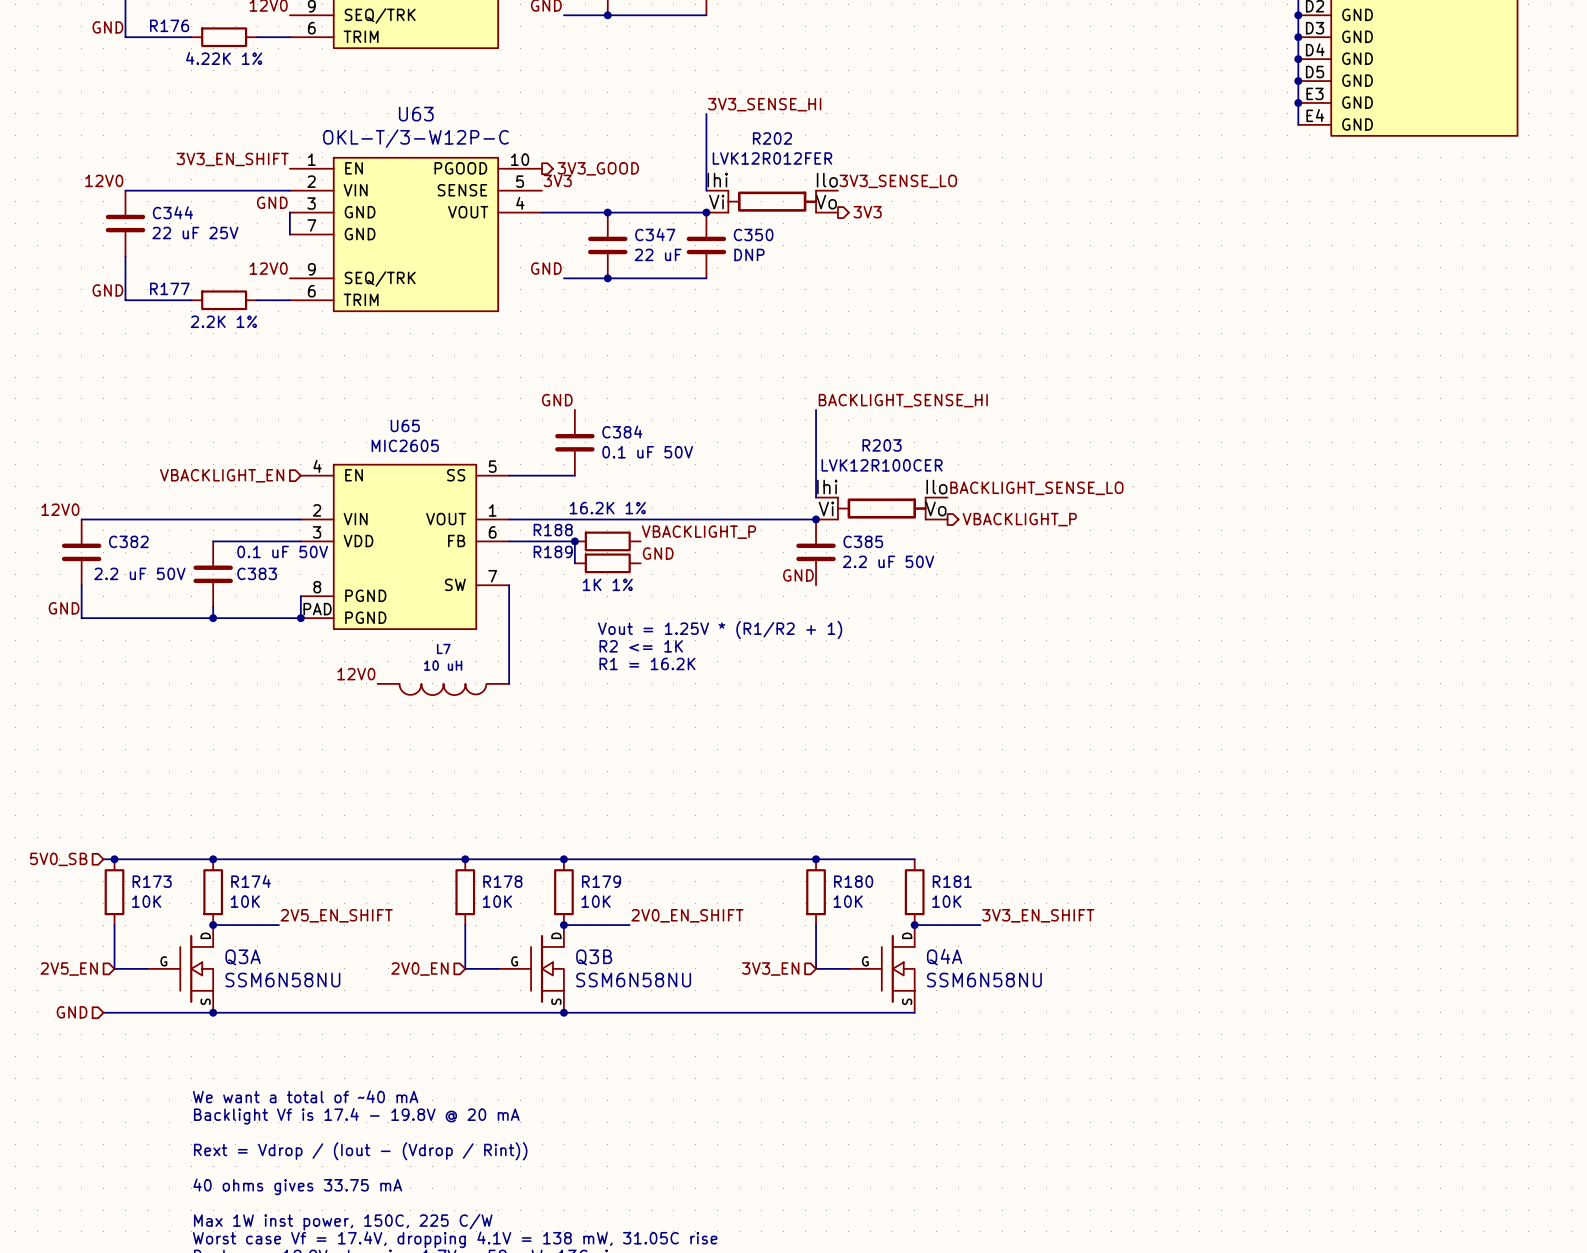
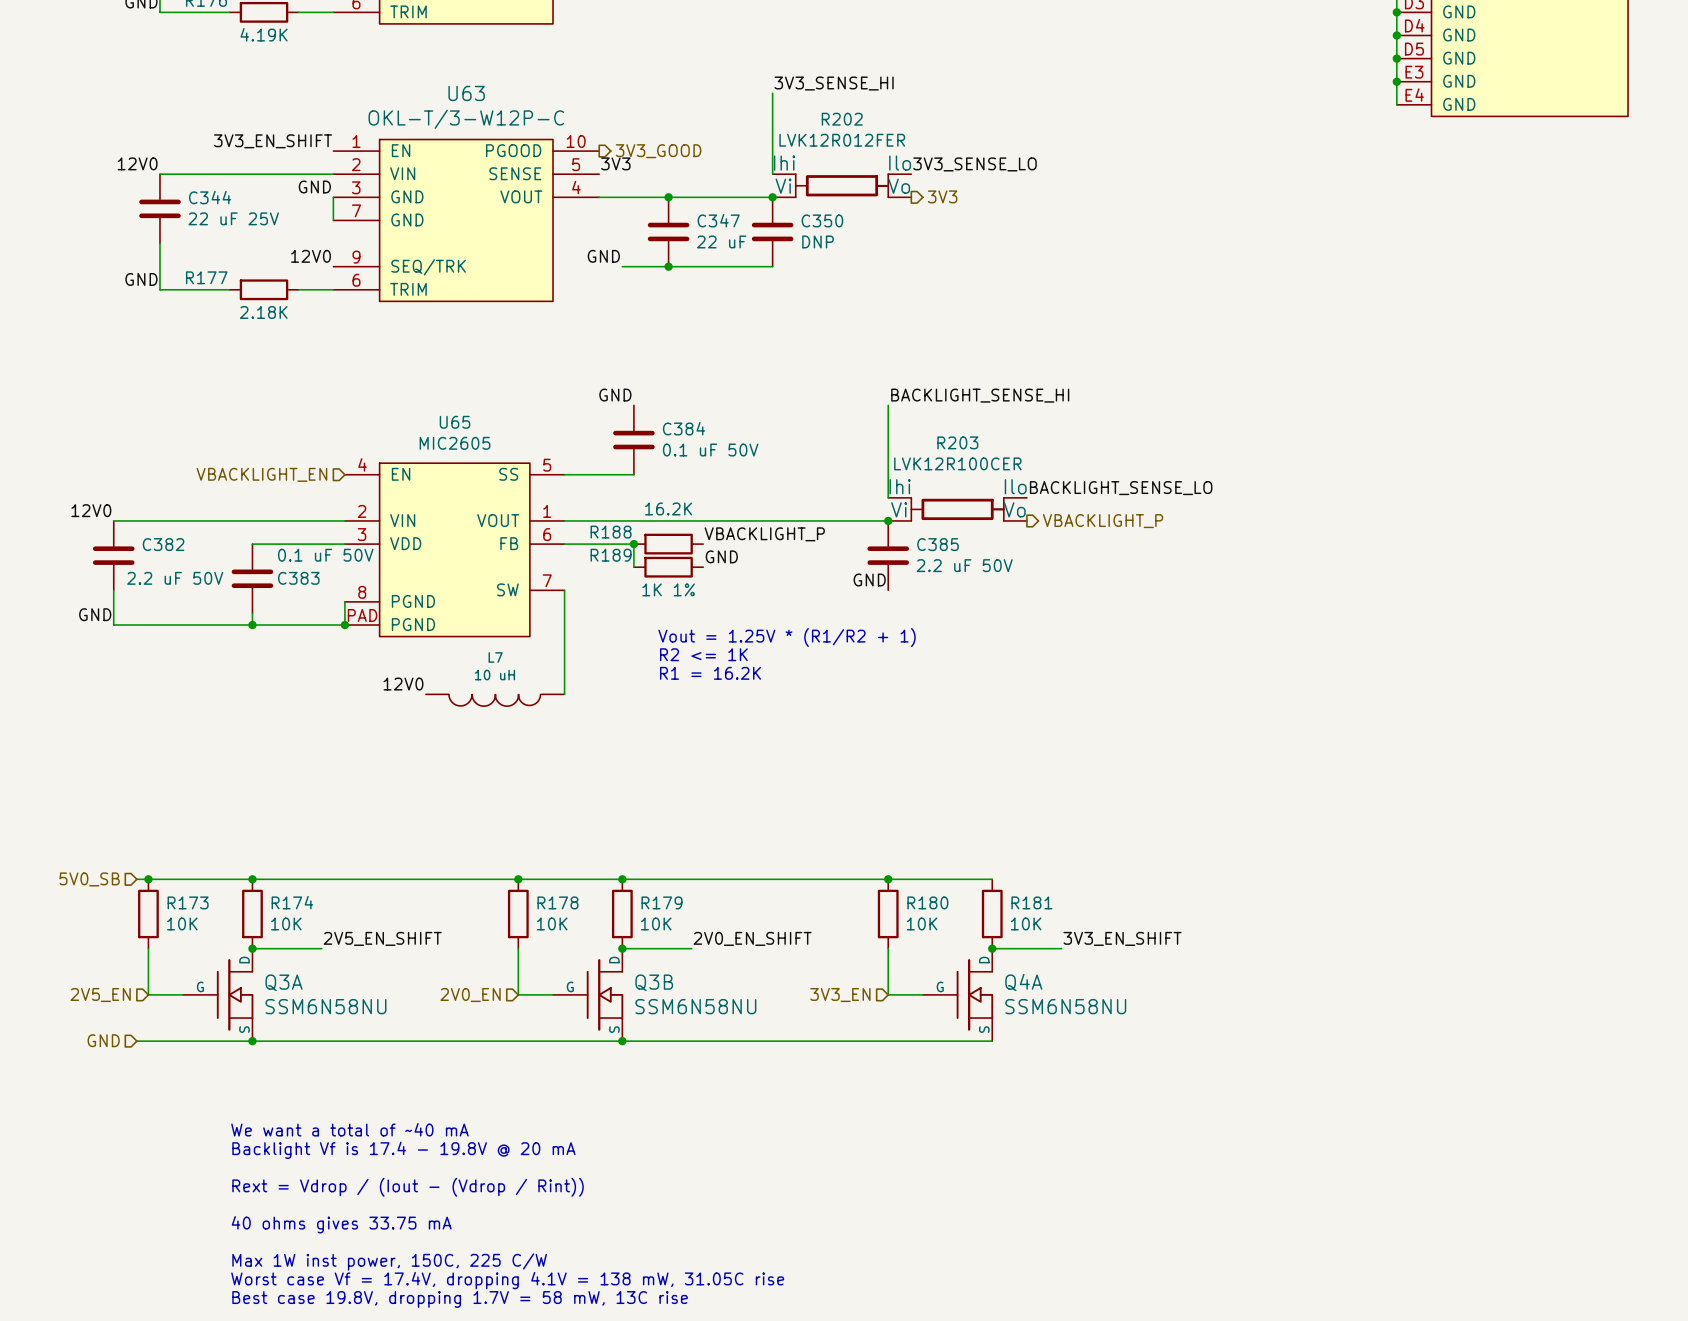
R176 value: 4.22K 1% (224, 58) -> 4.19K (264, 34)
R177 value: 2.2K 1% (223, 321) -> 2.18K (263, 312)
R188 value: 16.2K 1% (607, 508) -> 16.2K (668, 508)

